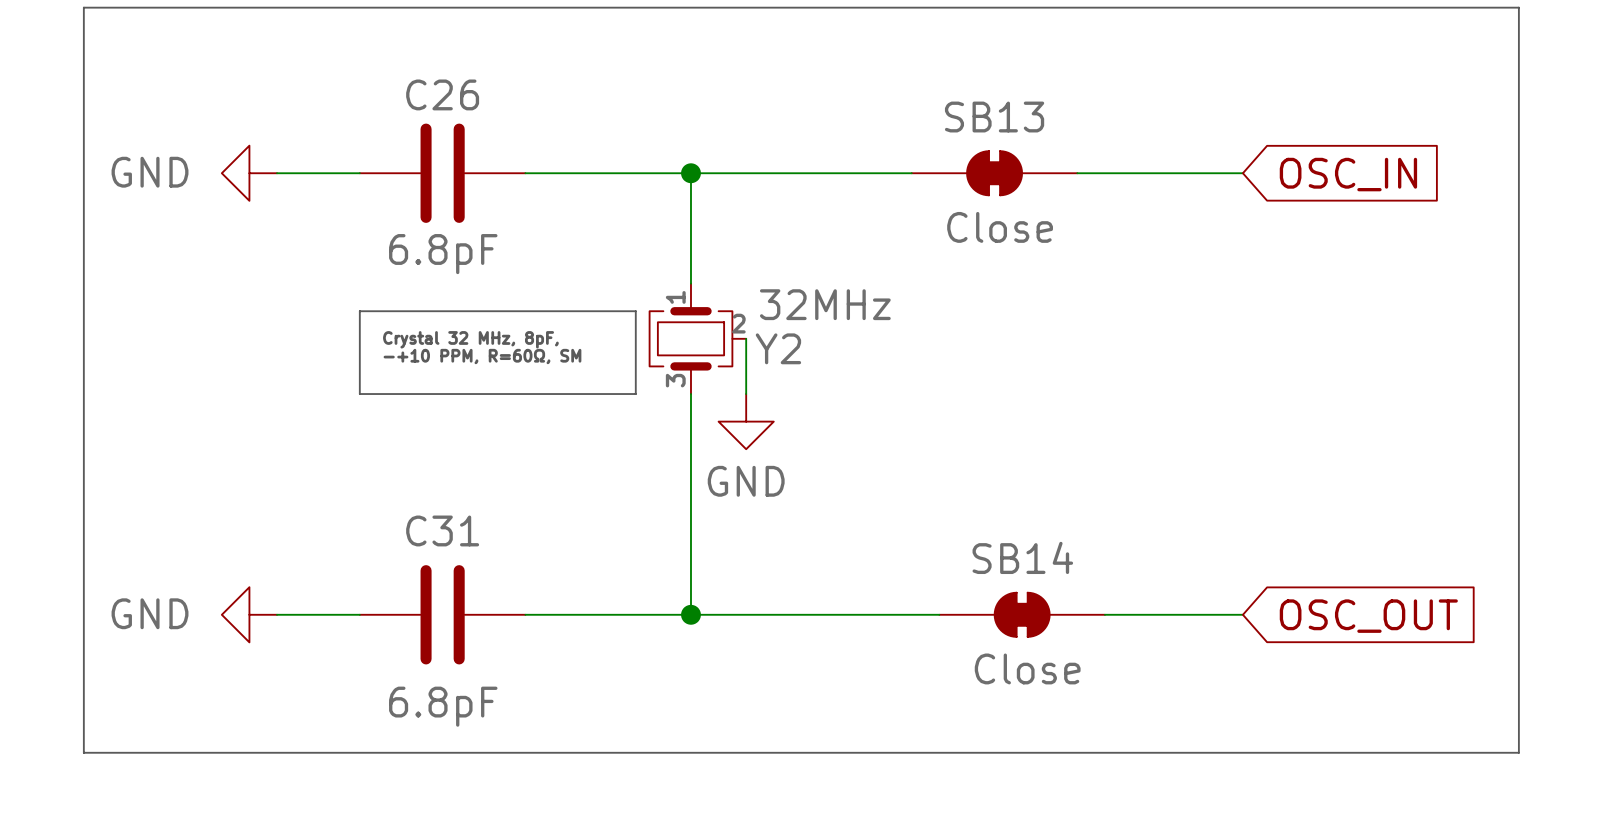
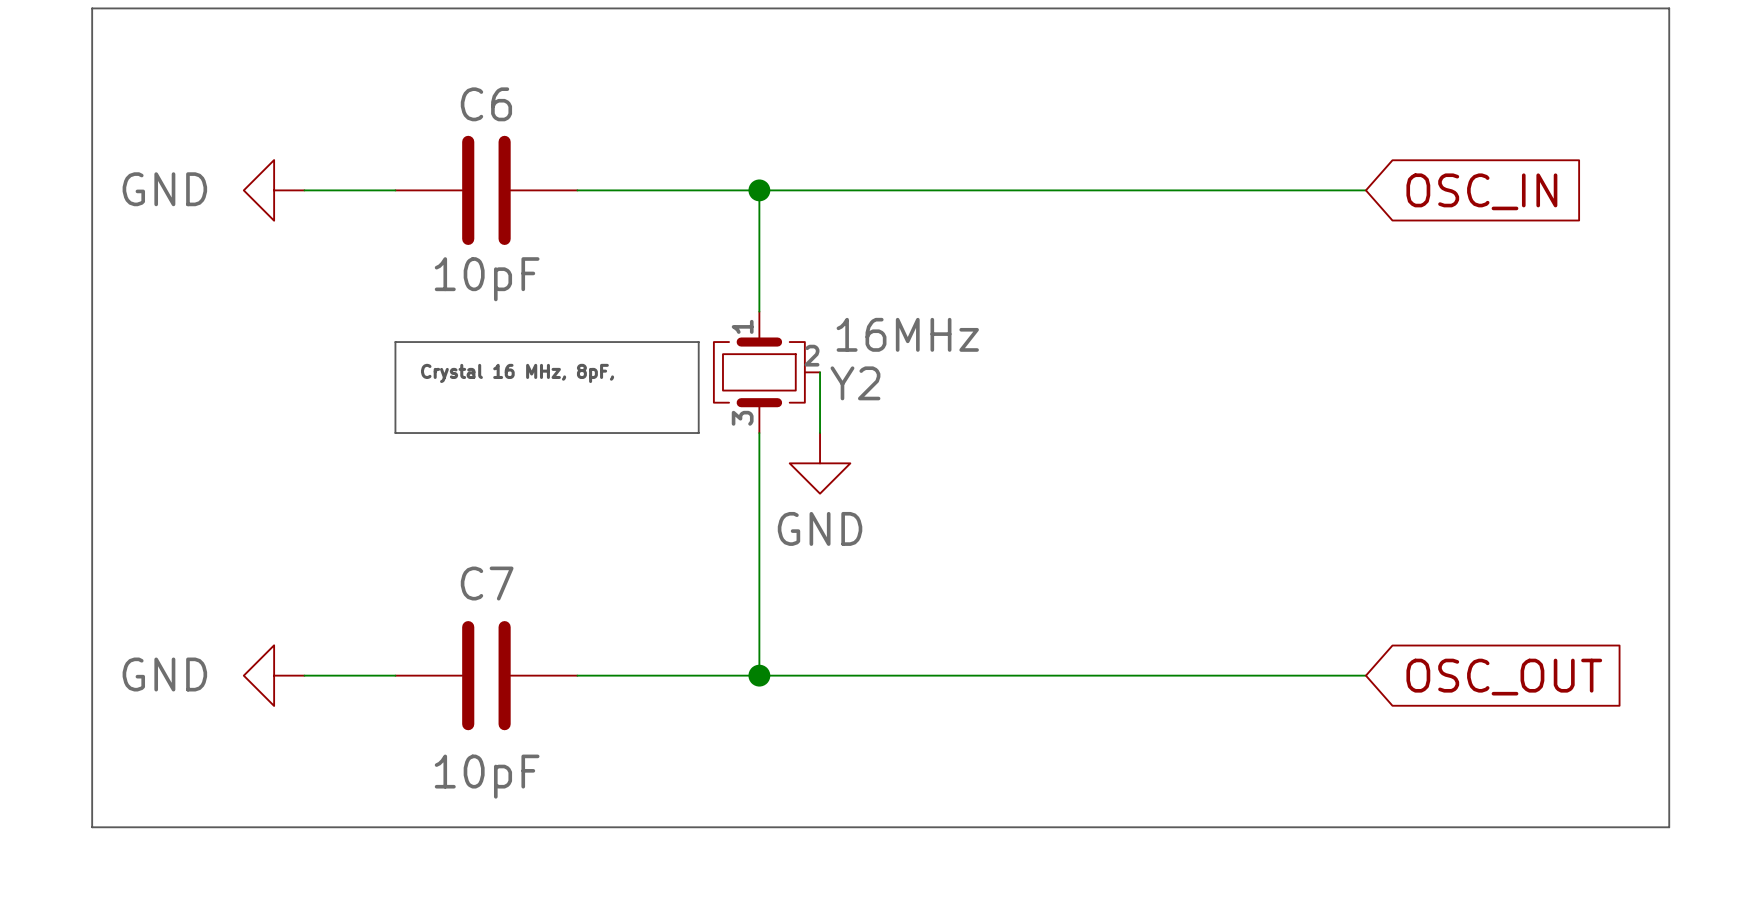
C26 name: C26 (442, 94) -> C6 (486, 104)
SB13: Close (994, 173) -> none
C26 value: 6.8pF (443, 254) -> 10pF (487, 279)
Y2 value: 32MHz (825, 304) -> 16MHz (907, 334)
text: Crystal 32 MHz, 8pF, (470, 339) -> Crystal 16 MHz, 8pF, (517, 373)
text: -+10 PPM, R=60Ω, SM (482, 356) -> none
C31 name: C31 (442, 530) -> C7 (487, 583)
SB14: Close (1022, 614) -> none
C31 value: 6.8pF (443, 706) -> 10pF (487, 776)

